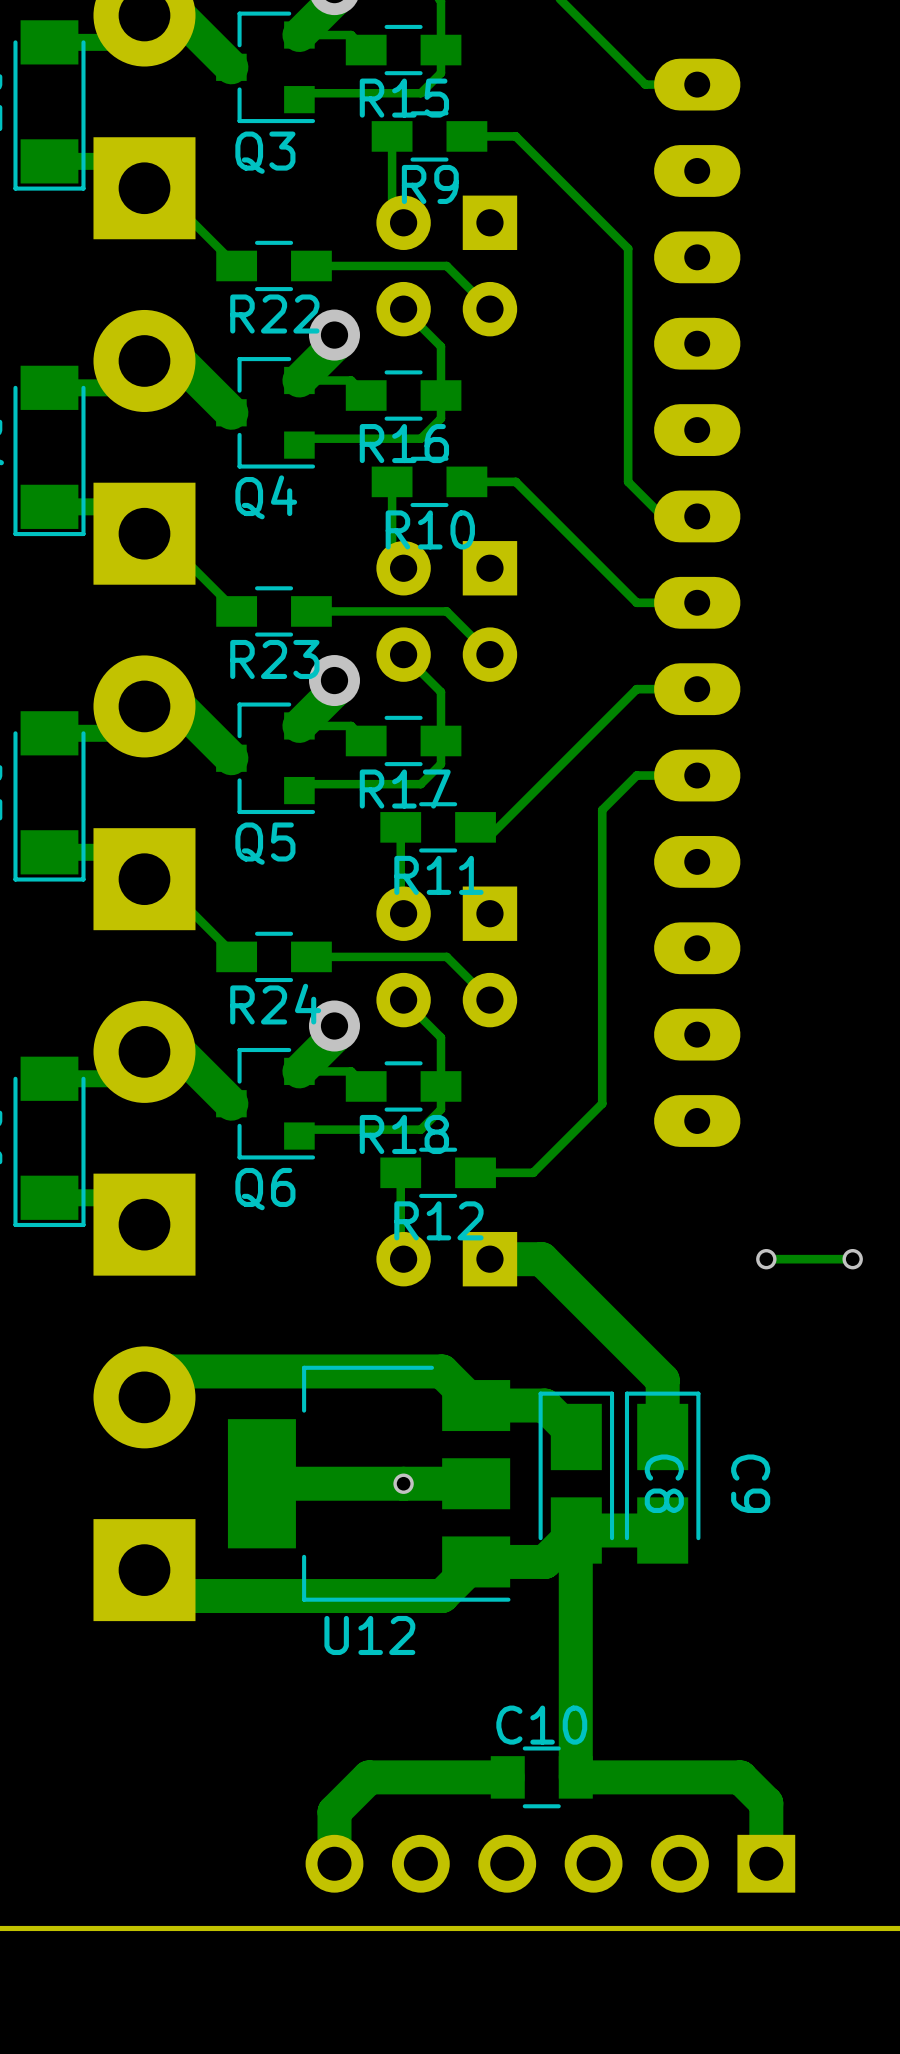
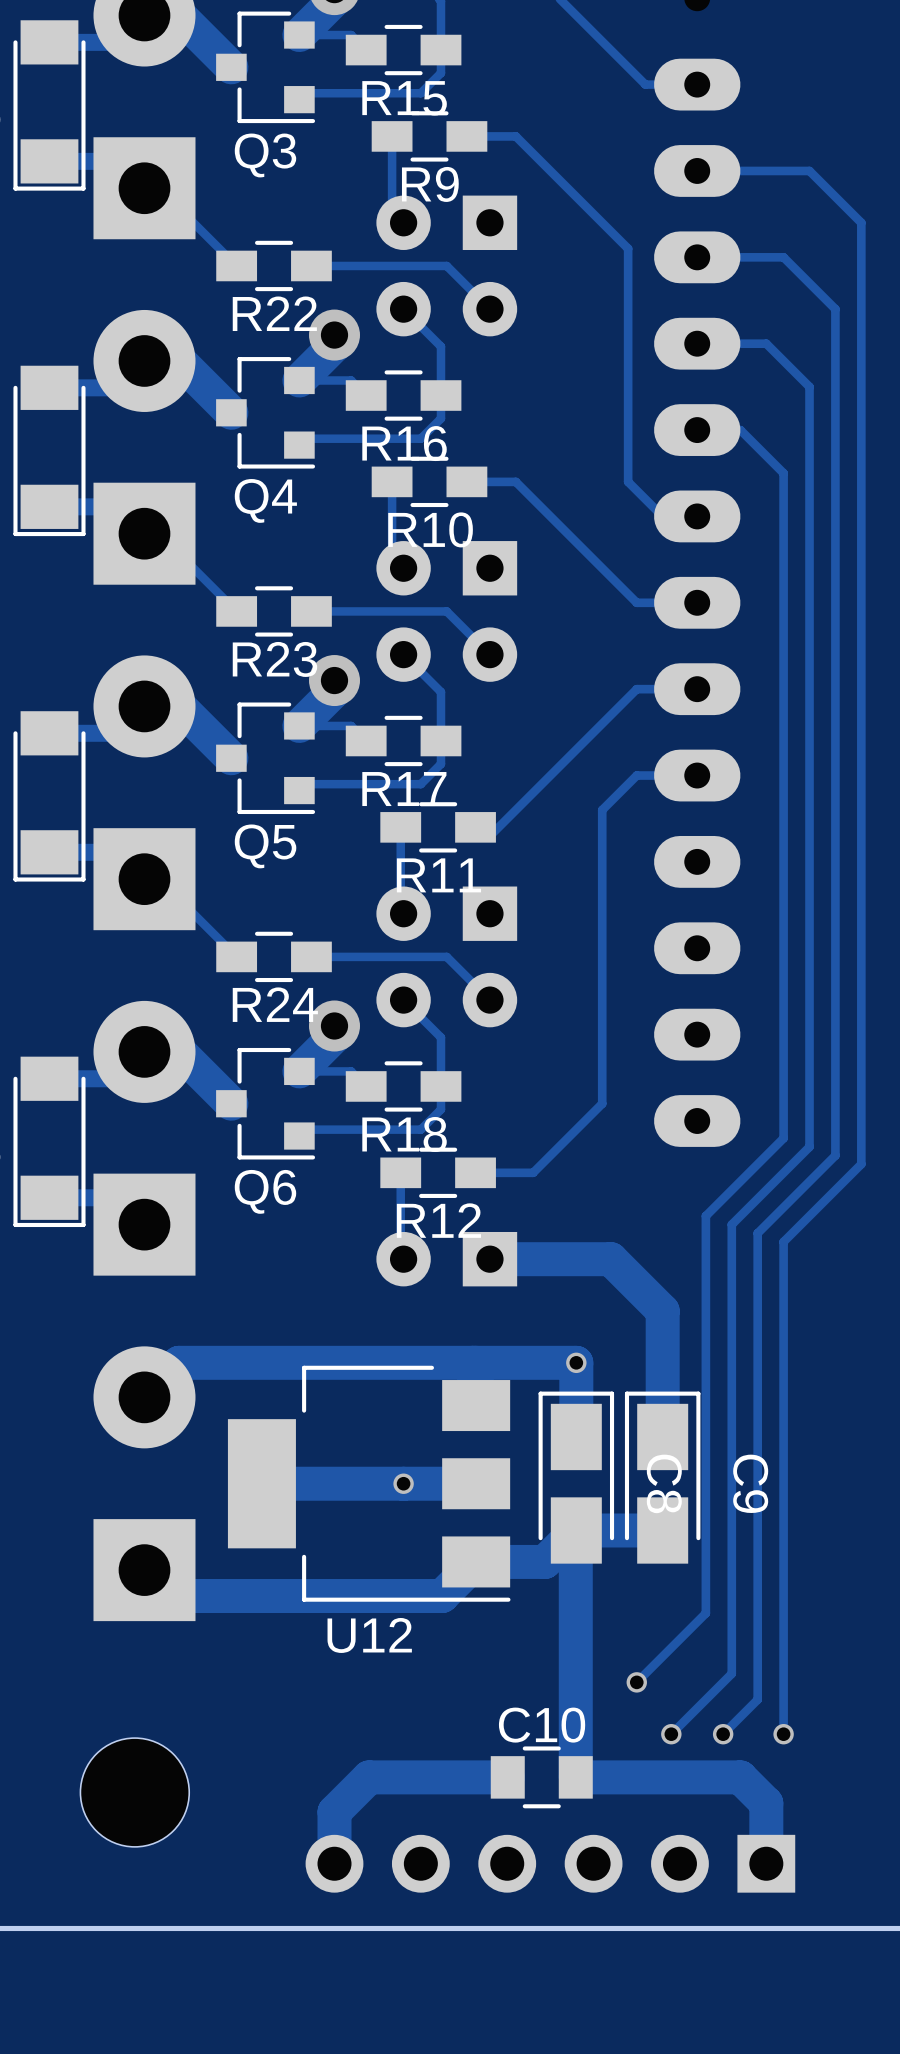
track: none -> (697, 170) (809, 170) (861, 222) (861, 1164) (783, 1241) (783, 1734)
track: none -> (697, 257) (783, 257) (835, 309) (835, 1155) (757, 1233) (757, 1699) (723, 1734)
track: none -> (697, 343) (766, 343) (809, 386) (809, 1146) (731, 1224) (731, 1673) (671, 1734)
track: none -> (697, 430) (740, 430) (783, 473) (783, 1138) (705, 1216) (705, 1613) (636, 1682)
track: (541, 1259) (662, 1380) -> (541, 1259) (610, 1259) (662, 1311) (662, 1380)
via: (766, 1259) -> none
track: (852, 1259) (766, 1259) -> none
via: (852, 1259) -> none
via: none -> (576, 1362)
track: (170, 1371) (442, 1371) (476, 1405) (544, 1405) (576, 1436) -> (170, 1371) (179, 1362) (576, 1362) (576, 1436)
via: none -> (636, 1682)
via: none -> (671, 1734)
via: none -> (723, 1734)
via: none -> (783, 1734)
part: none -> (134, 1792)

